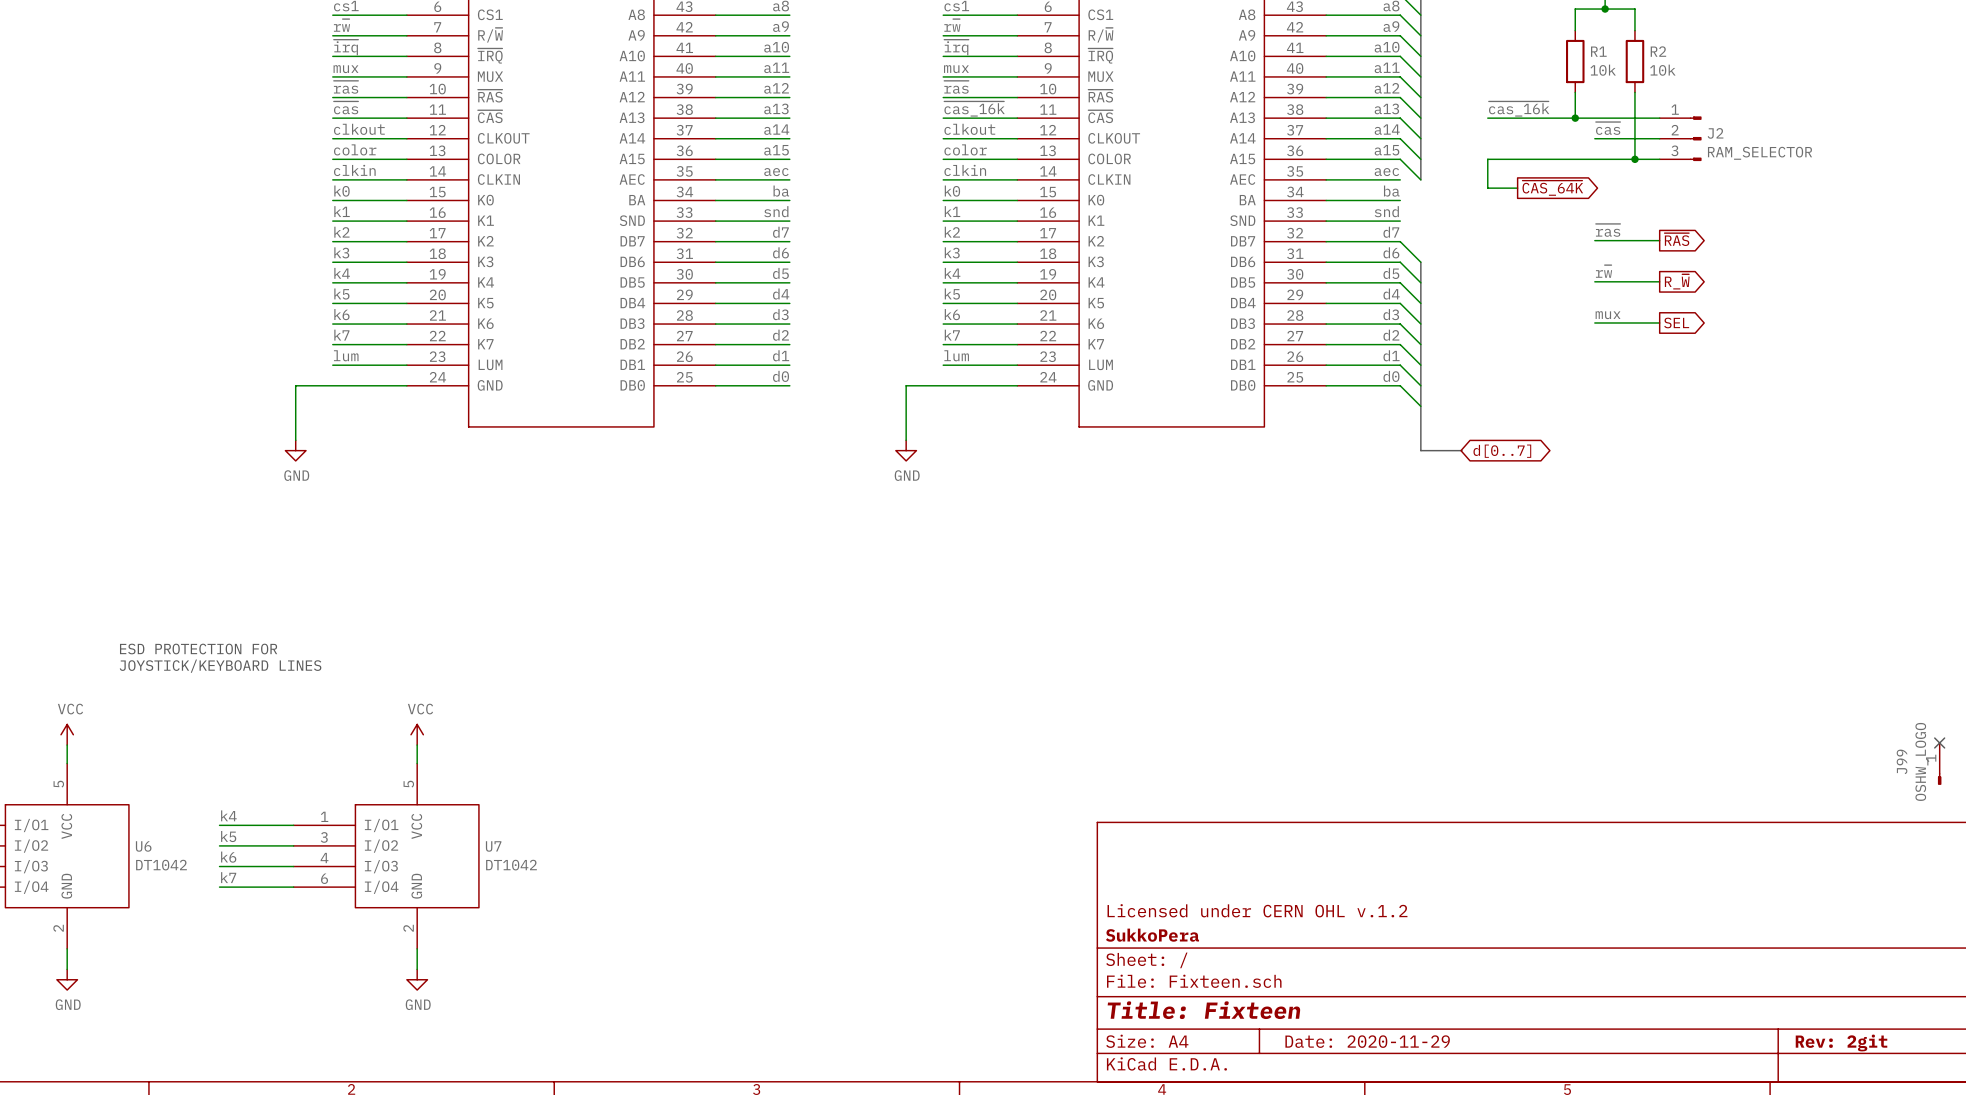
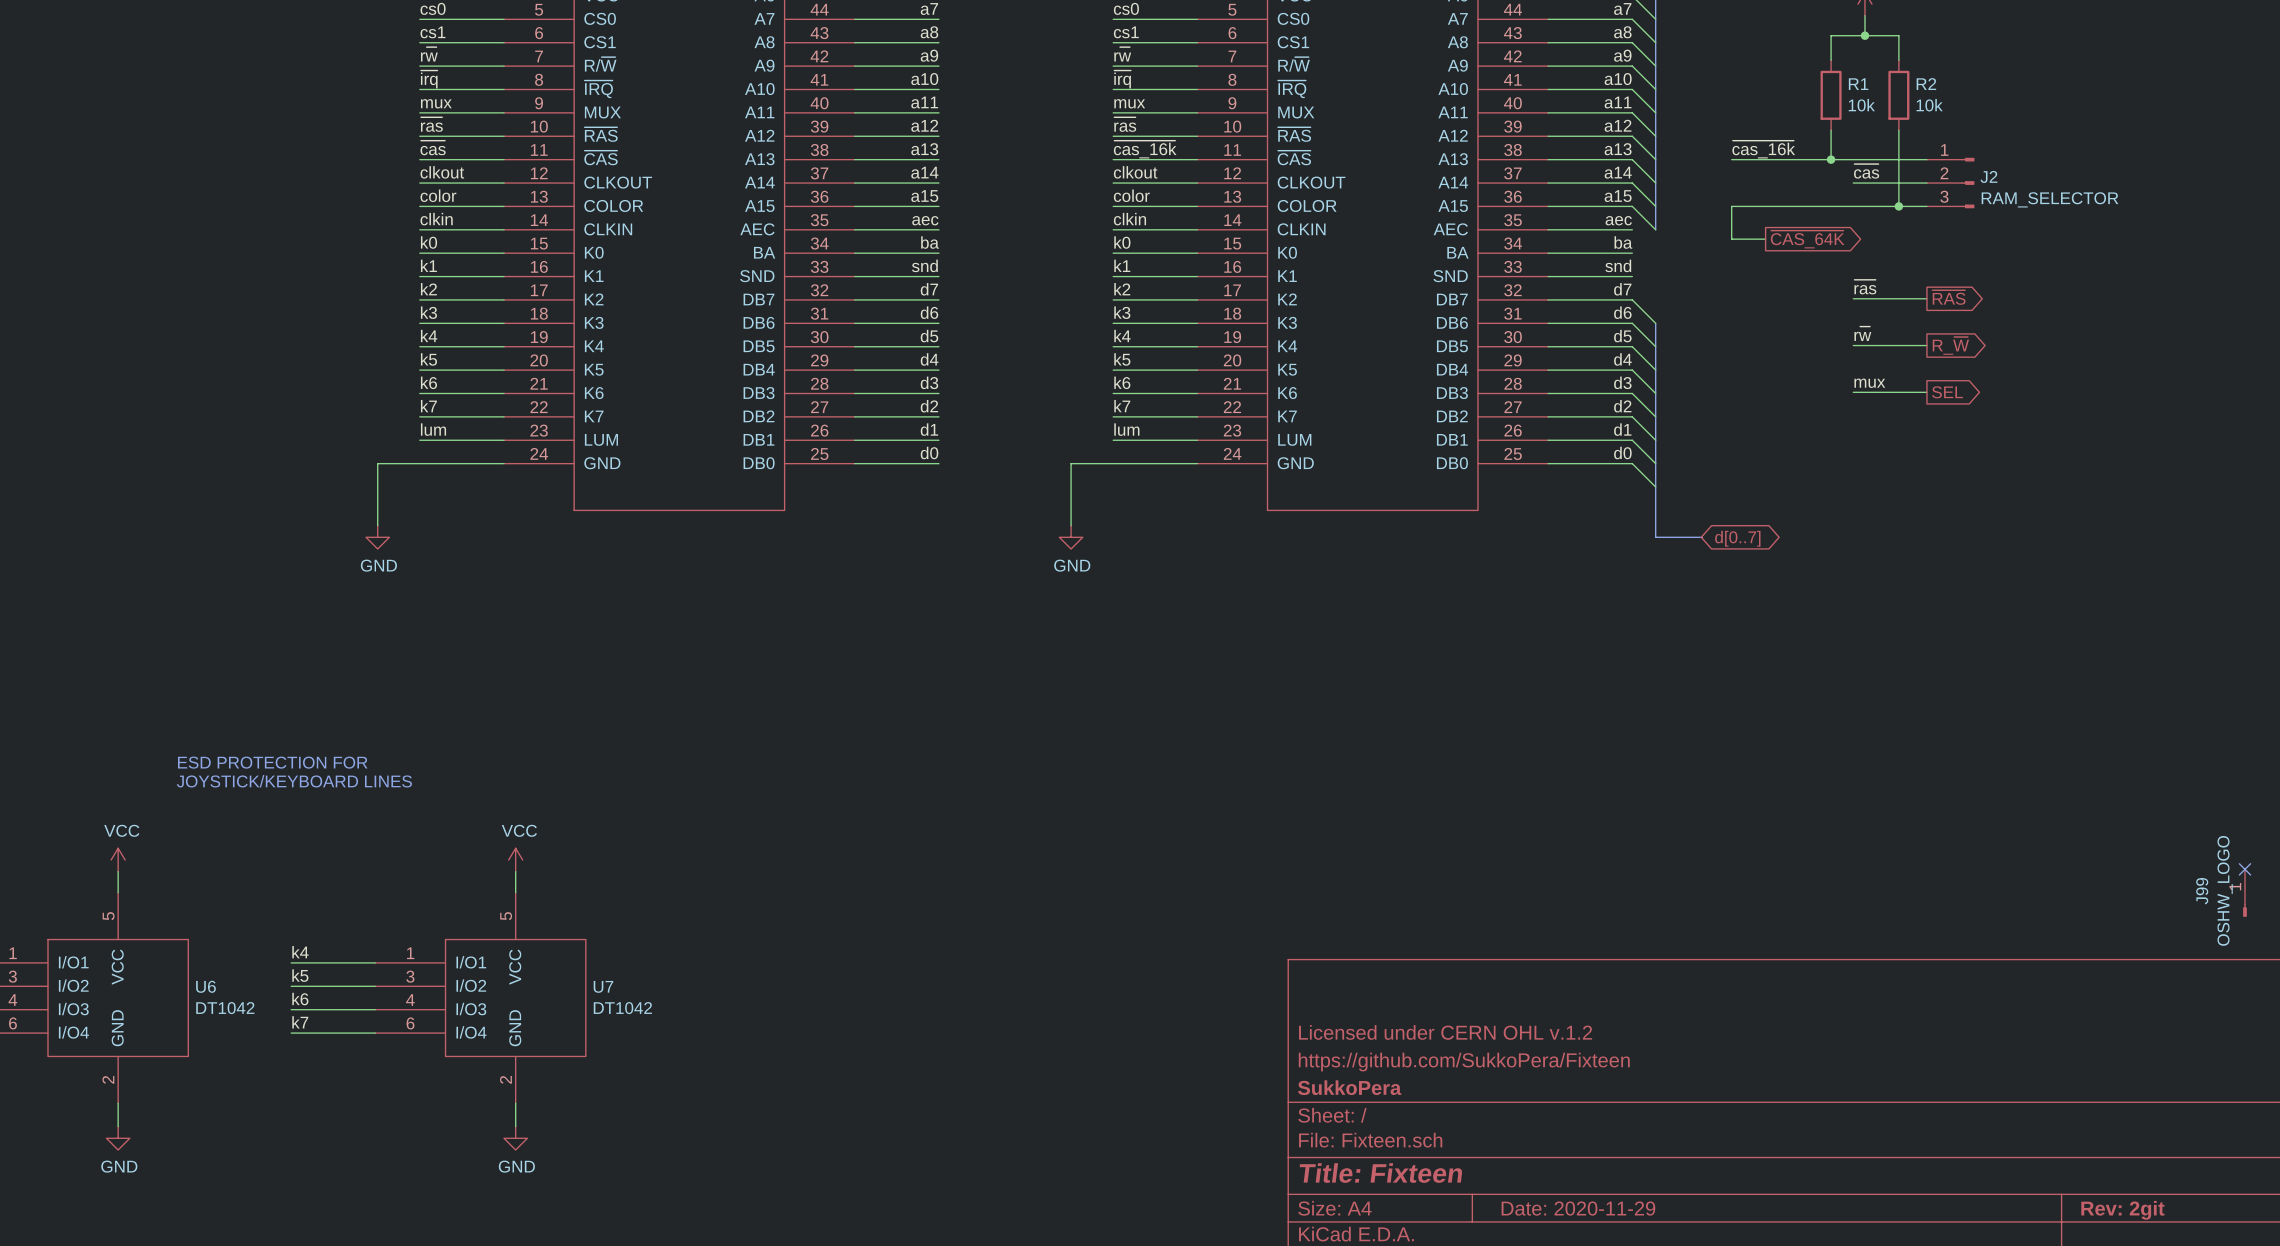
title block: none -> Licensed under CERN OHL v.1.2 (1445, 1032)
title block: Licensed under CERN OHL v.1.2 (1257, 910) -> https://github.com/SukkoPera/Fixteen (1464, 1062)

